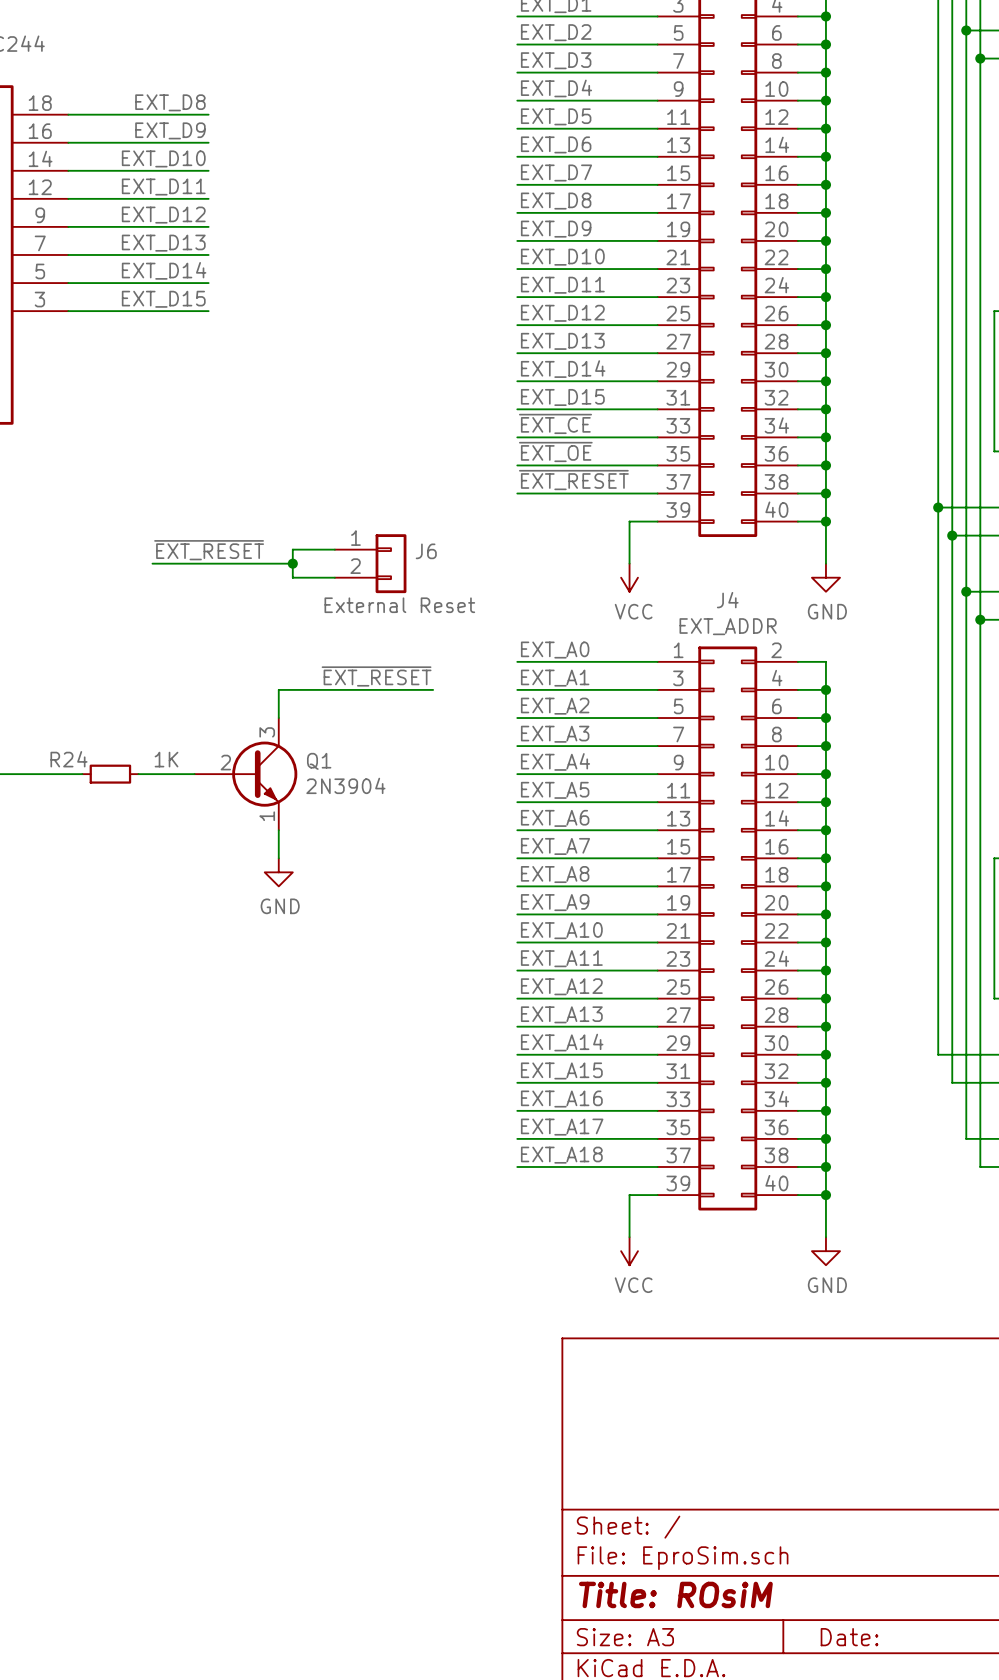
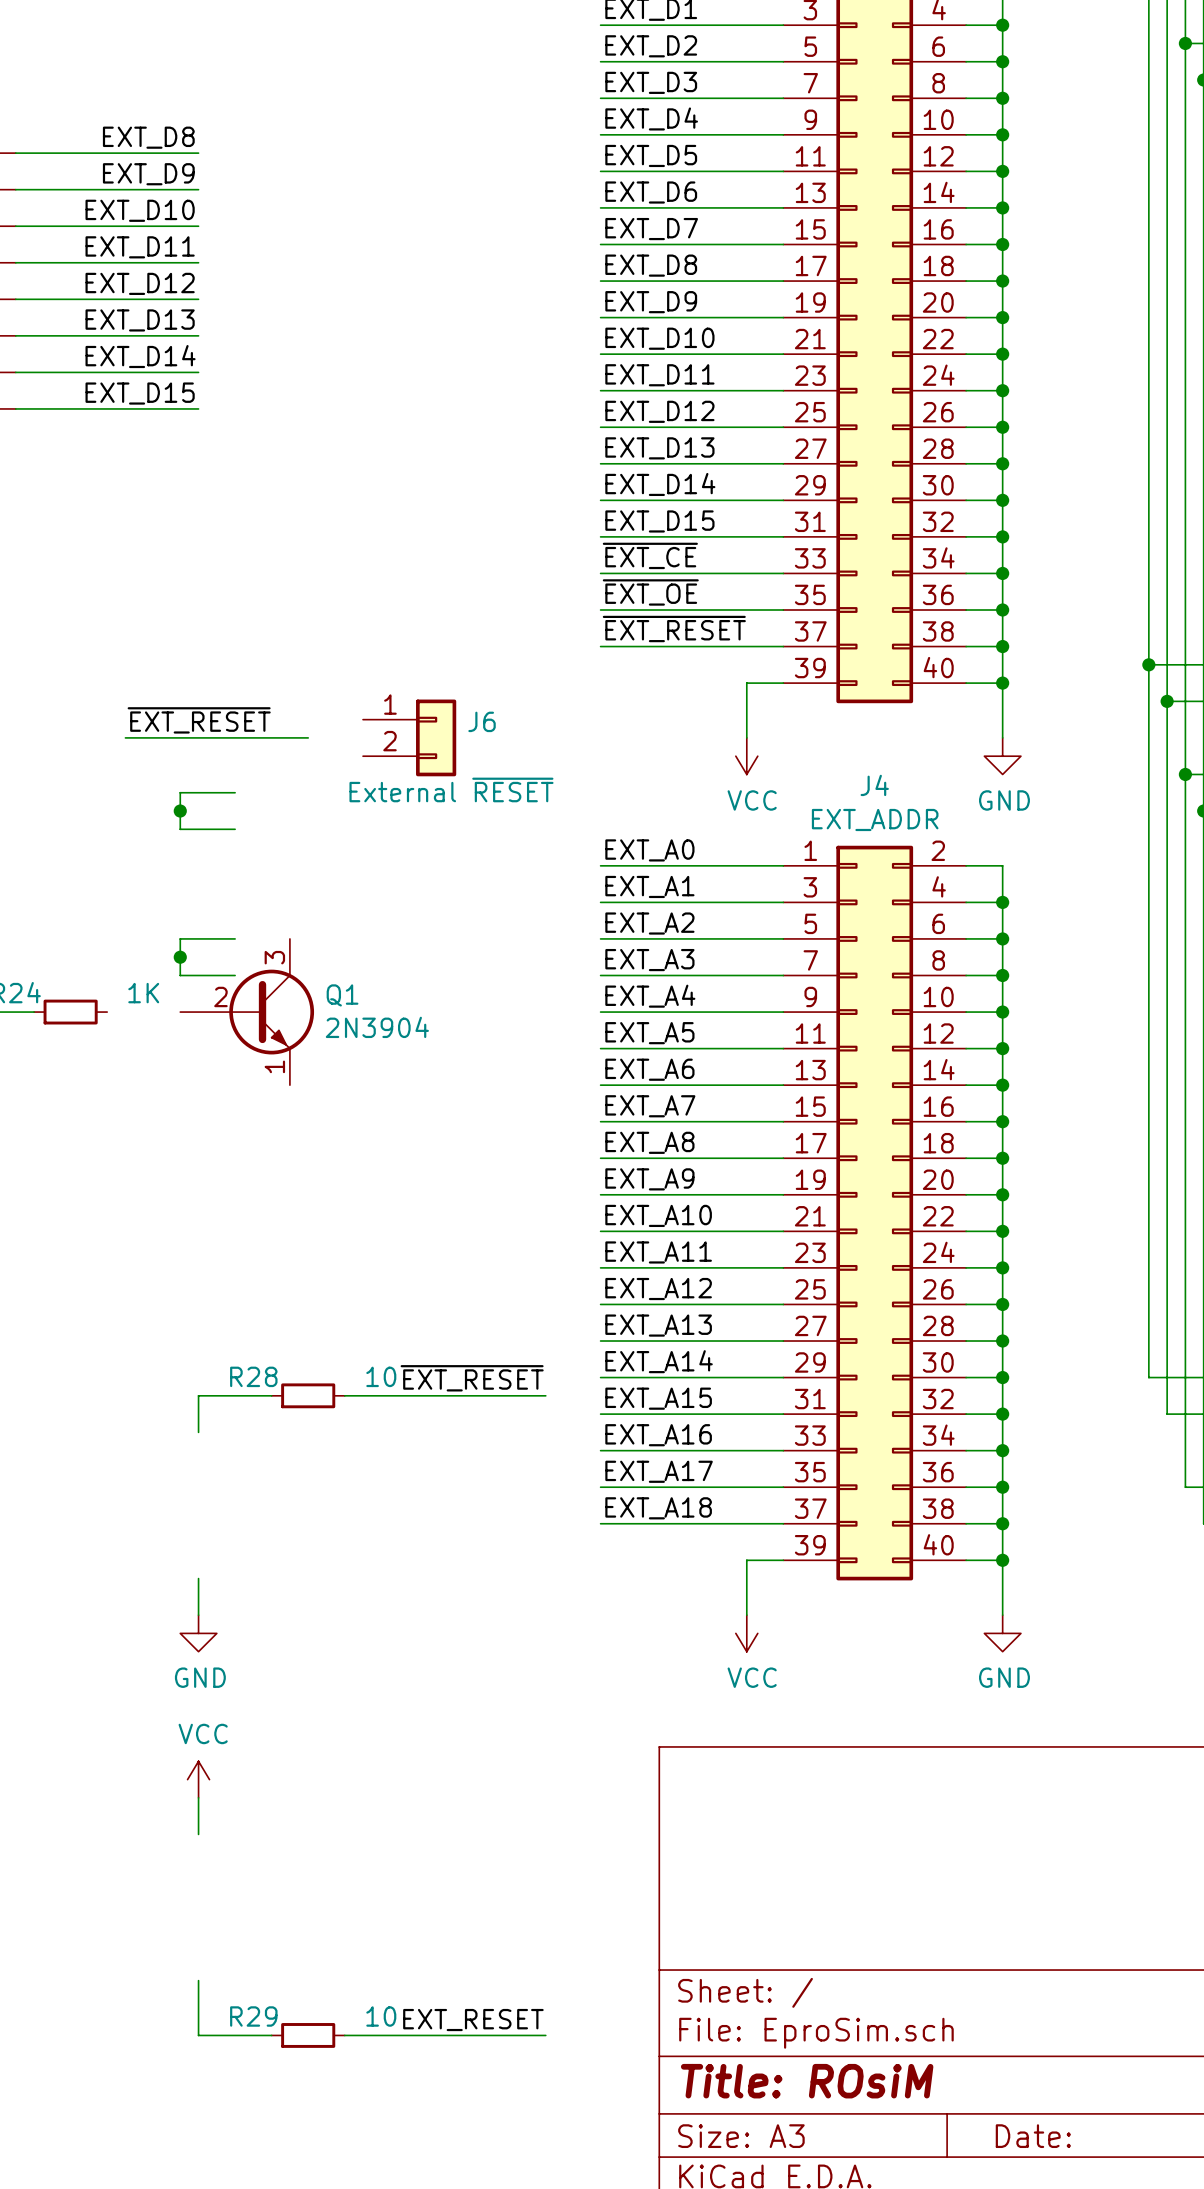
wire: (334, 549) (292, 549) (292, 577) (334, 577) -> (235, 792) (180, 792) (180, 829) (235, 829)
junction: (292, 563) -> none
J6 value: External Reset (399, 605) -> External ~{RESET} (451, 789)
junction: none -> (180, 811)
label: ~{EXT_RESET} (376, 676) -> none
wire: (433, 689) (278, 689) (278, 718) -> none
wire: none -> (235, 938) (180, 938) (180, 975) (235, 975)
junction: none -> (180, 957)
wire: (138, 774) (194, 774) -> none
wire: (278, 830) (278, 858) -> none
power symbol: GND (278, 872) -> none
label: none -> ~{EXT_RESET} (472, 1378)
wire: none -> (271, 1395) (198, 1395) (198, 1432)
R28: none -> 10 (308, 1395)
wire: none -> (344, 1395) (545, 1395)
wire: none -> (198, 1578) (198, 1615)
power symbol: none -> GND (198, 1633)
power symbol: none -> VCC (198, 1779)
wire: none -> (198, 1797) (198, 1834)
wire: none -> (198, 1980) (198, 2035) (271, 2035)
label: none -> EXT_RESET (473, 2020)
R29: none -> 10 (308, 2035)
wire: none -> (344, 2035) (545, 2035)

